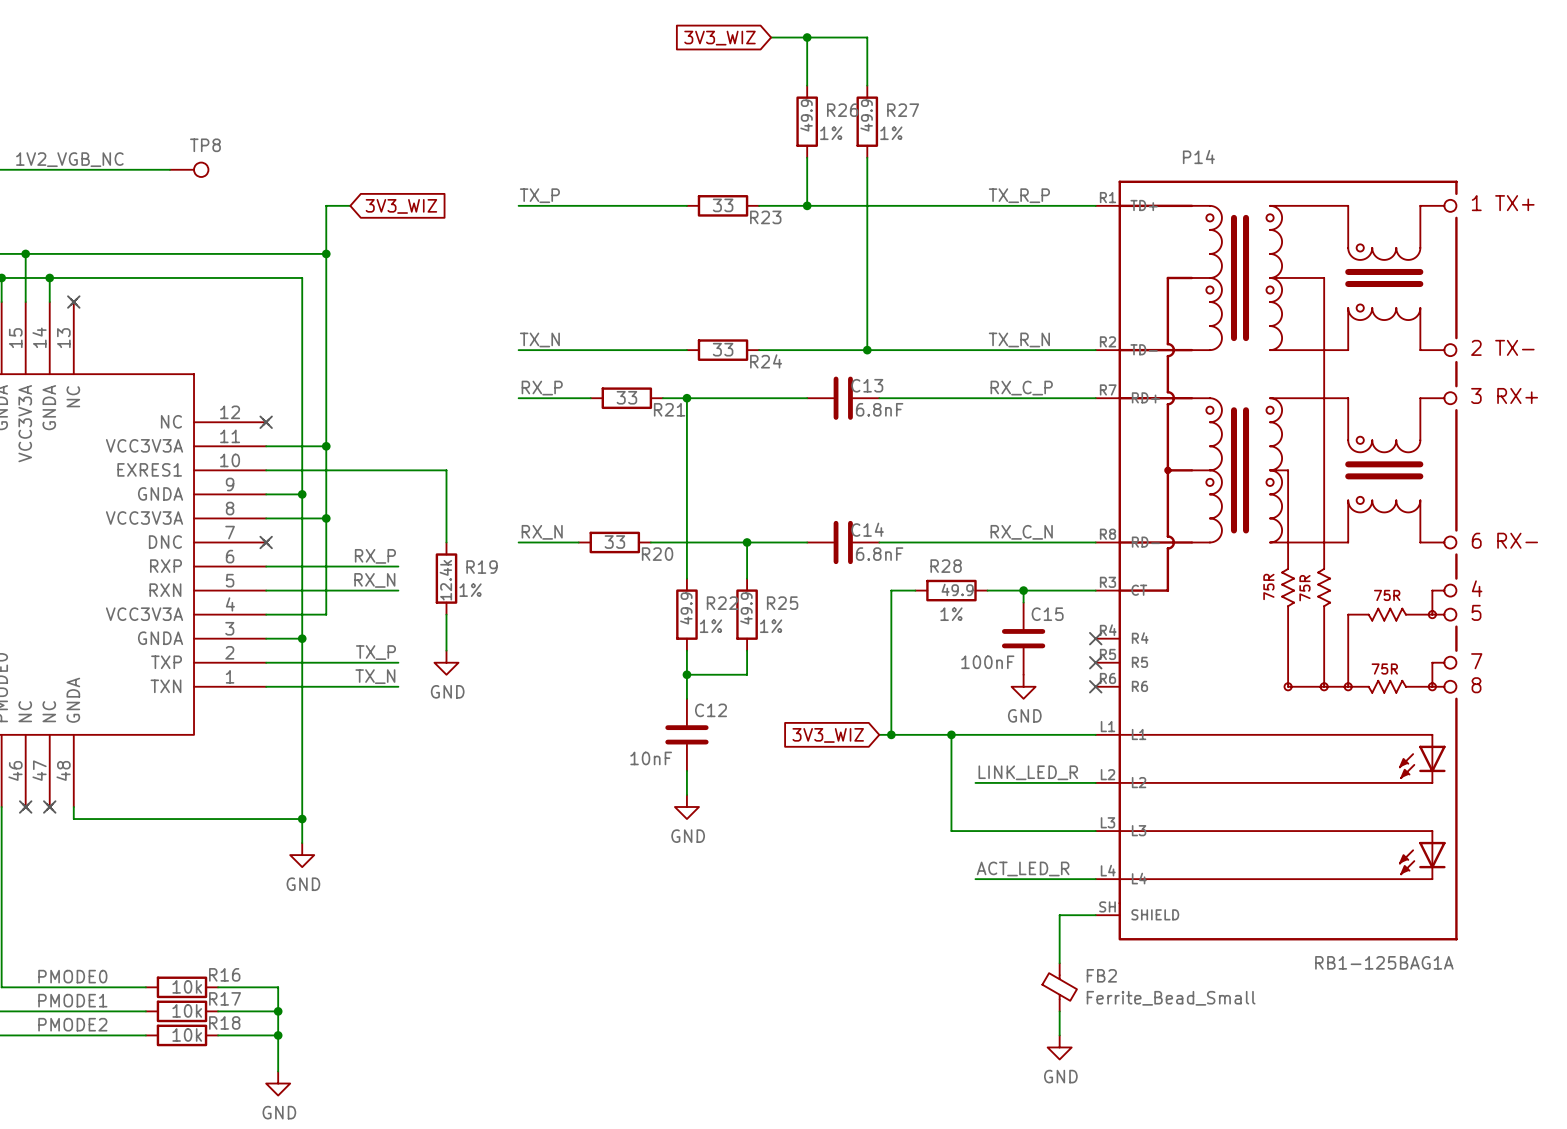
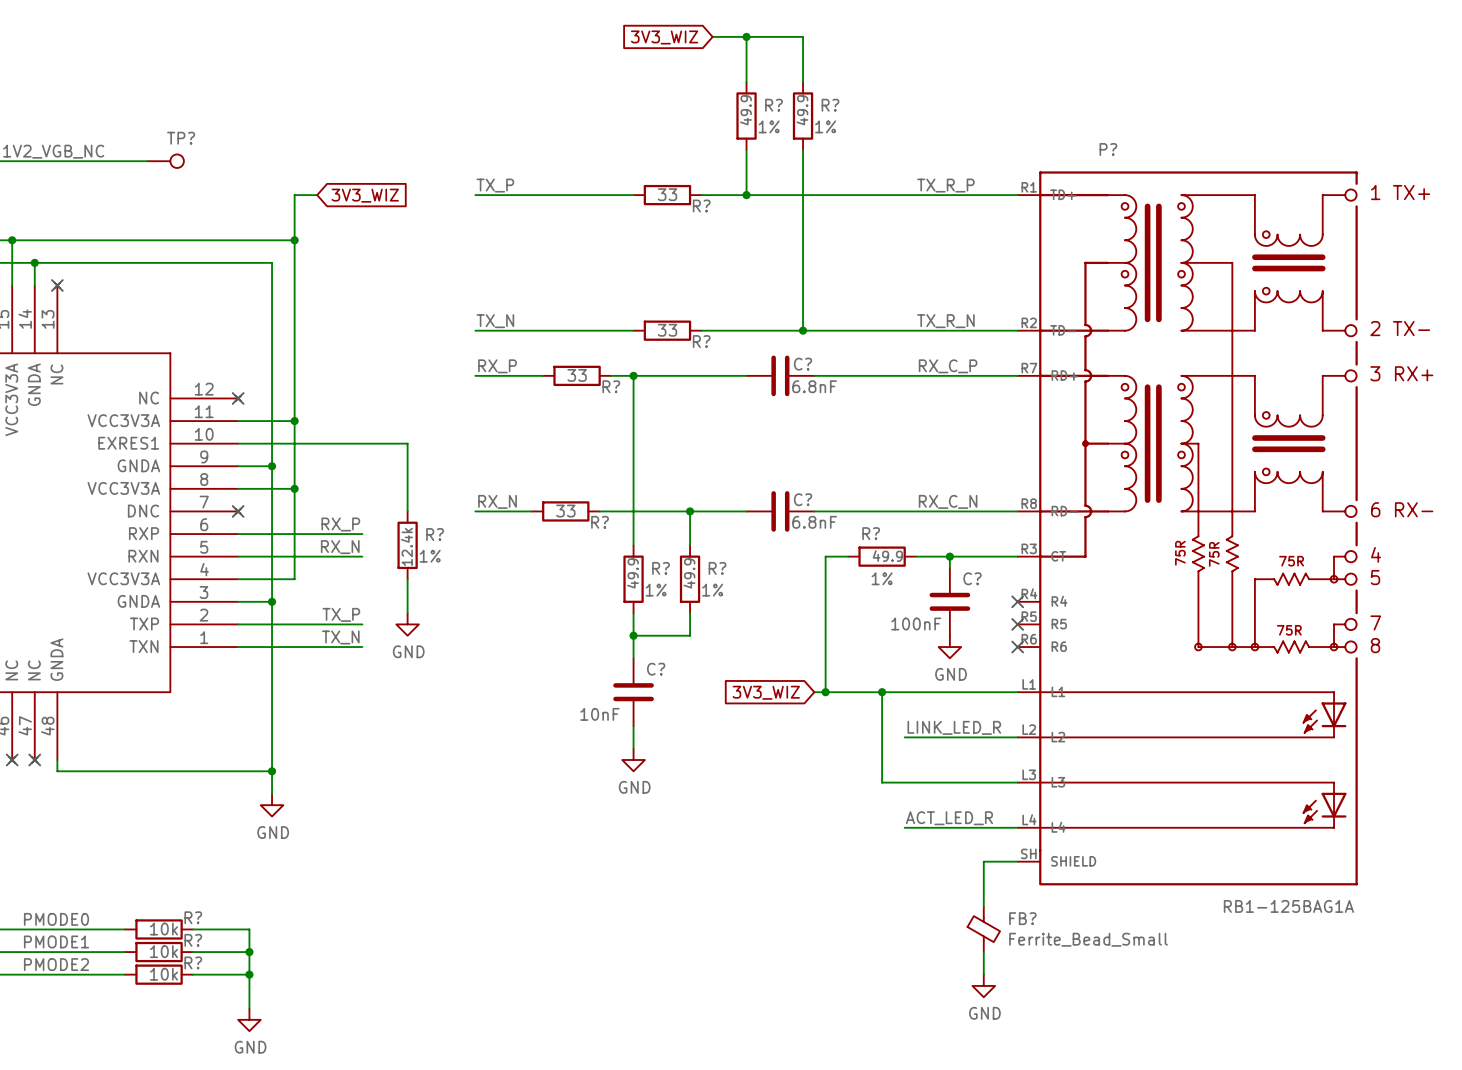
R26 name: R26 (842, 110) -> R? (774, 105)
R27 name: R27 (903, 110) -> R? (830, 105)
TP8 name: TP8 (205, 145) -> TP? (181, 138)
P14 name: P14 (1198, 157) -> P? (1108, 149)
R23 name: R23 (765, 217) -> R? (701, 205)
R24 name: R24 (766, 361) -> R? (701, 341)
C13 name: C13 (867, 385) -> C? (803, 364)
R21 name: R21 (669, 409) -> R? (611, 386)
C14 name: C14 (867, 529) -> C? (803, 499)
R20 name: R20 (657, 554) -> R? (600, 522)
R28 name: R28 (946, 566) -> R? (871, 533)
R19 name: R19 (482, 567) -> R? (435, 534)
R22 name: R22 (722, 603) -> R? (661, 568)
R25 name: R25 (782, 603) -> R? (717, 568)
C15 name: C15 (1047, 614) -> C? (972, 578)
C12 name: C12 (711, 710) -> C? (656, 669)
R16 name: R16 (224, 974) -> R? (193, 917)
FB2 name: FB2 (1101, 975) -> FB? (1022, 918)
R17 name: R17 (225, 998) -> R? (193, 940)
R18 name: R18 (224, 1022) -> R? (193, 962)

